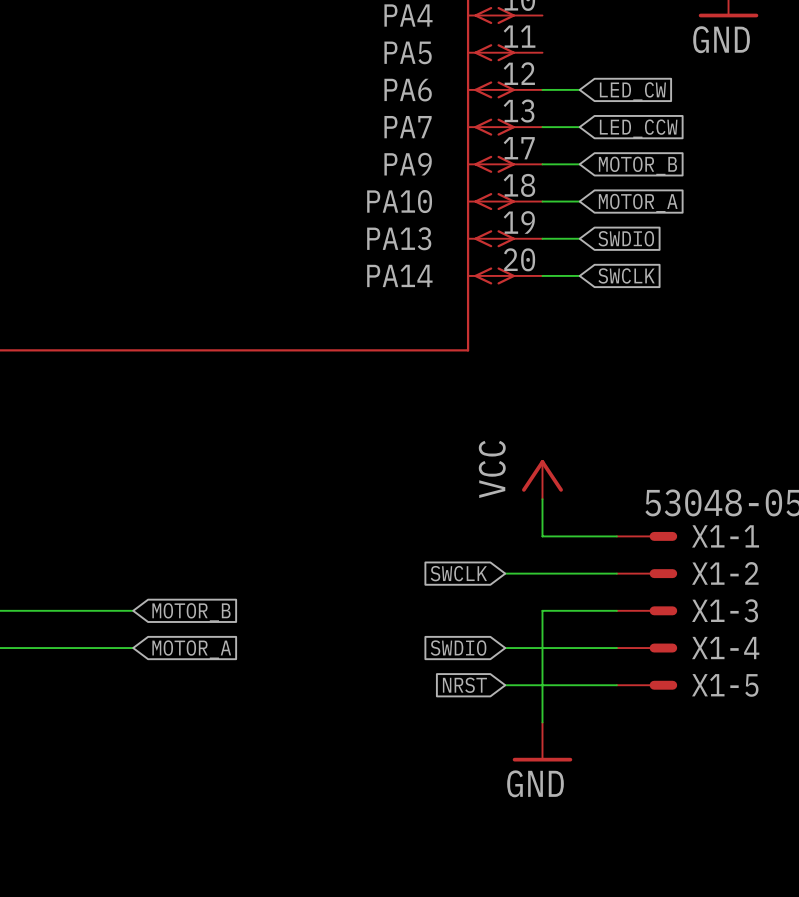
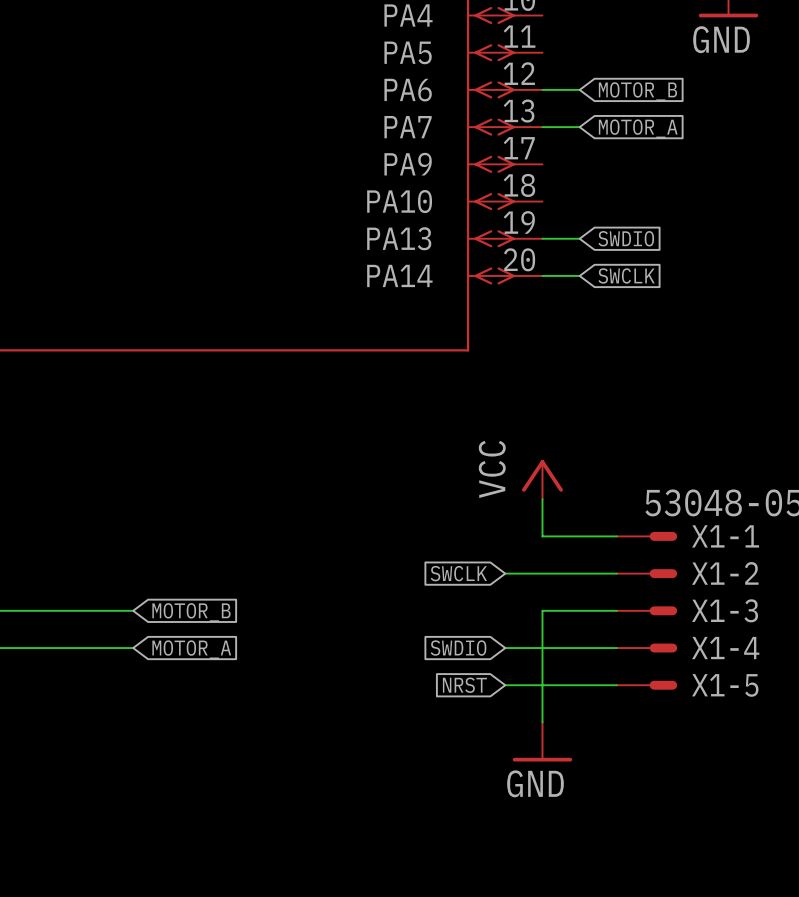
global label: LED_CW (632, 91) -> MOTOR_B (637, 91)
global label: LED_CCW (638, 128) -> MOTOR_A (638, 128)
wire: (542, 164) (579, 164) -> none
global label: MOTOR_B (637, 166) -> none
wire: (542, 201) (579, 201) -> none
global label: MOTOR_A (638, 203) -> none

